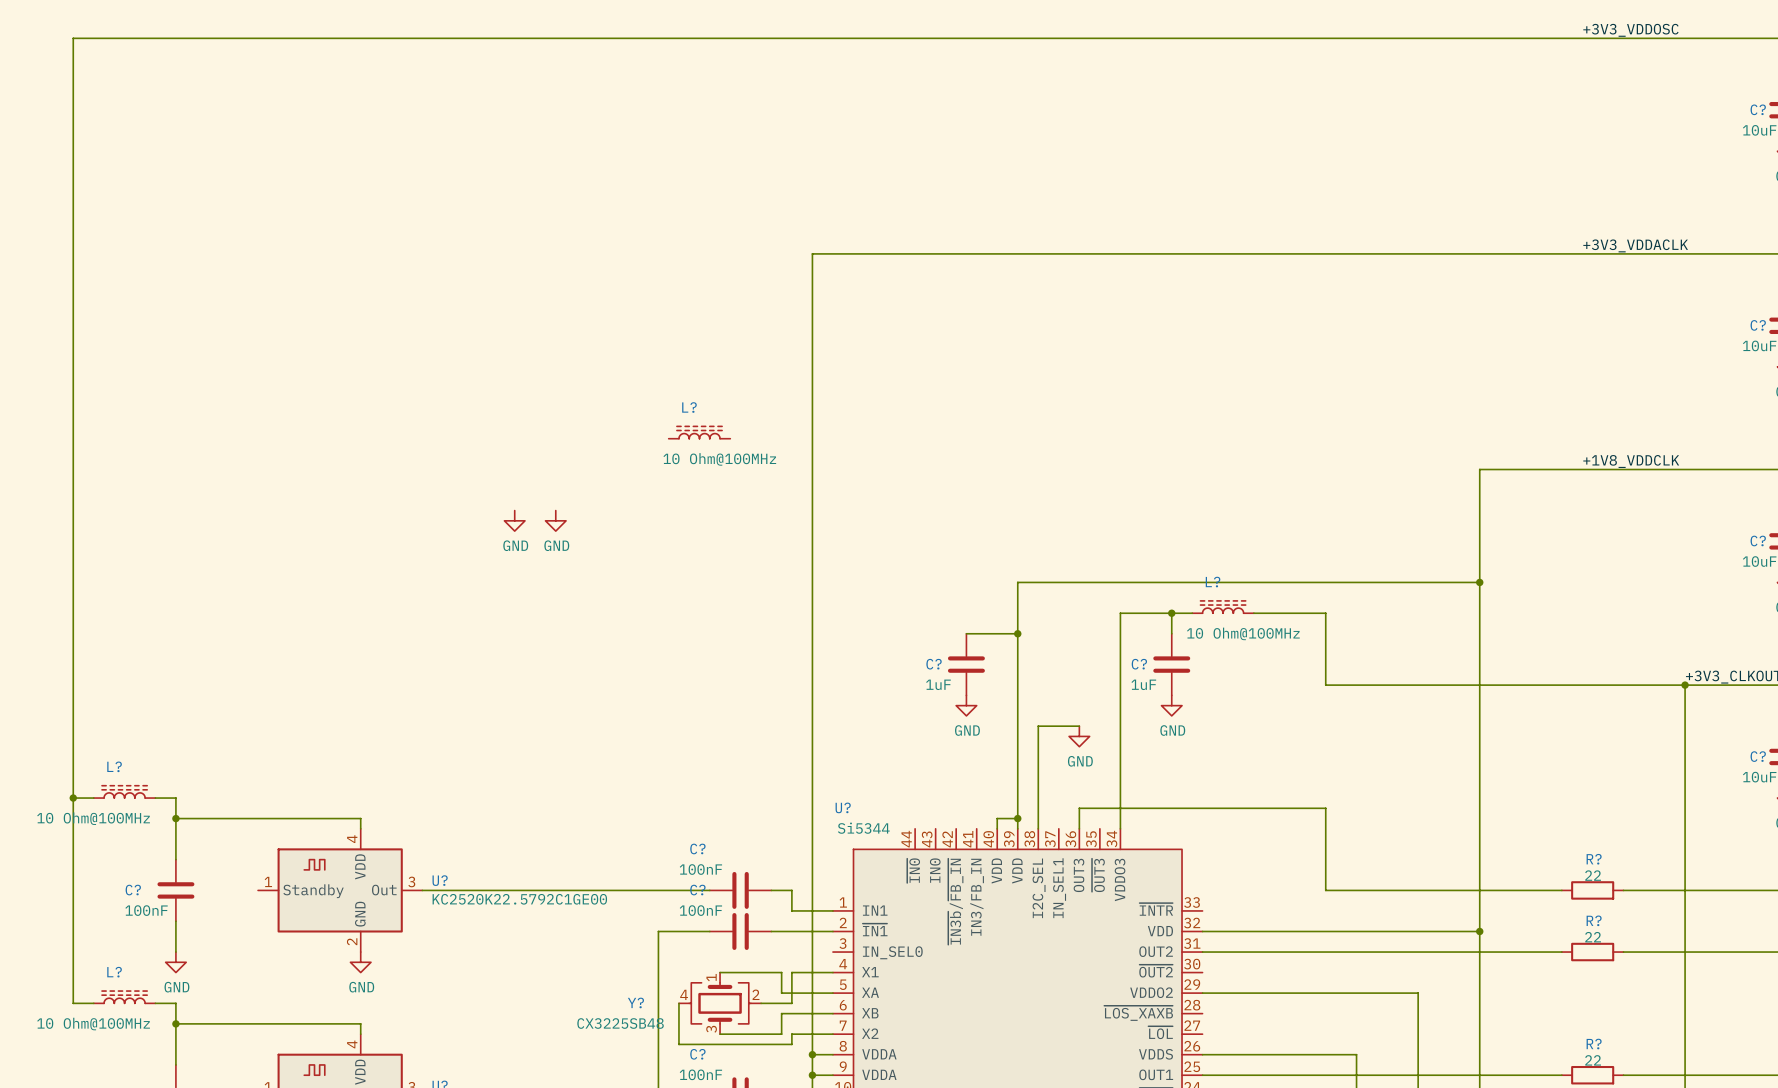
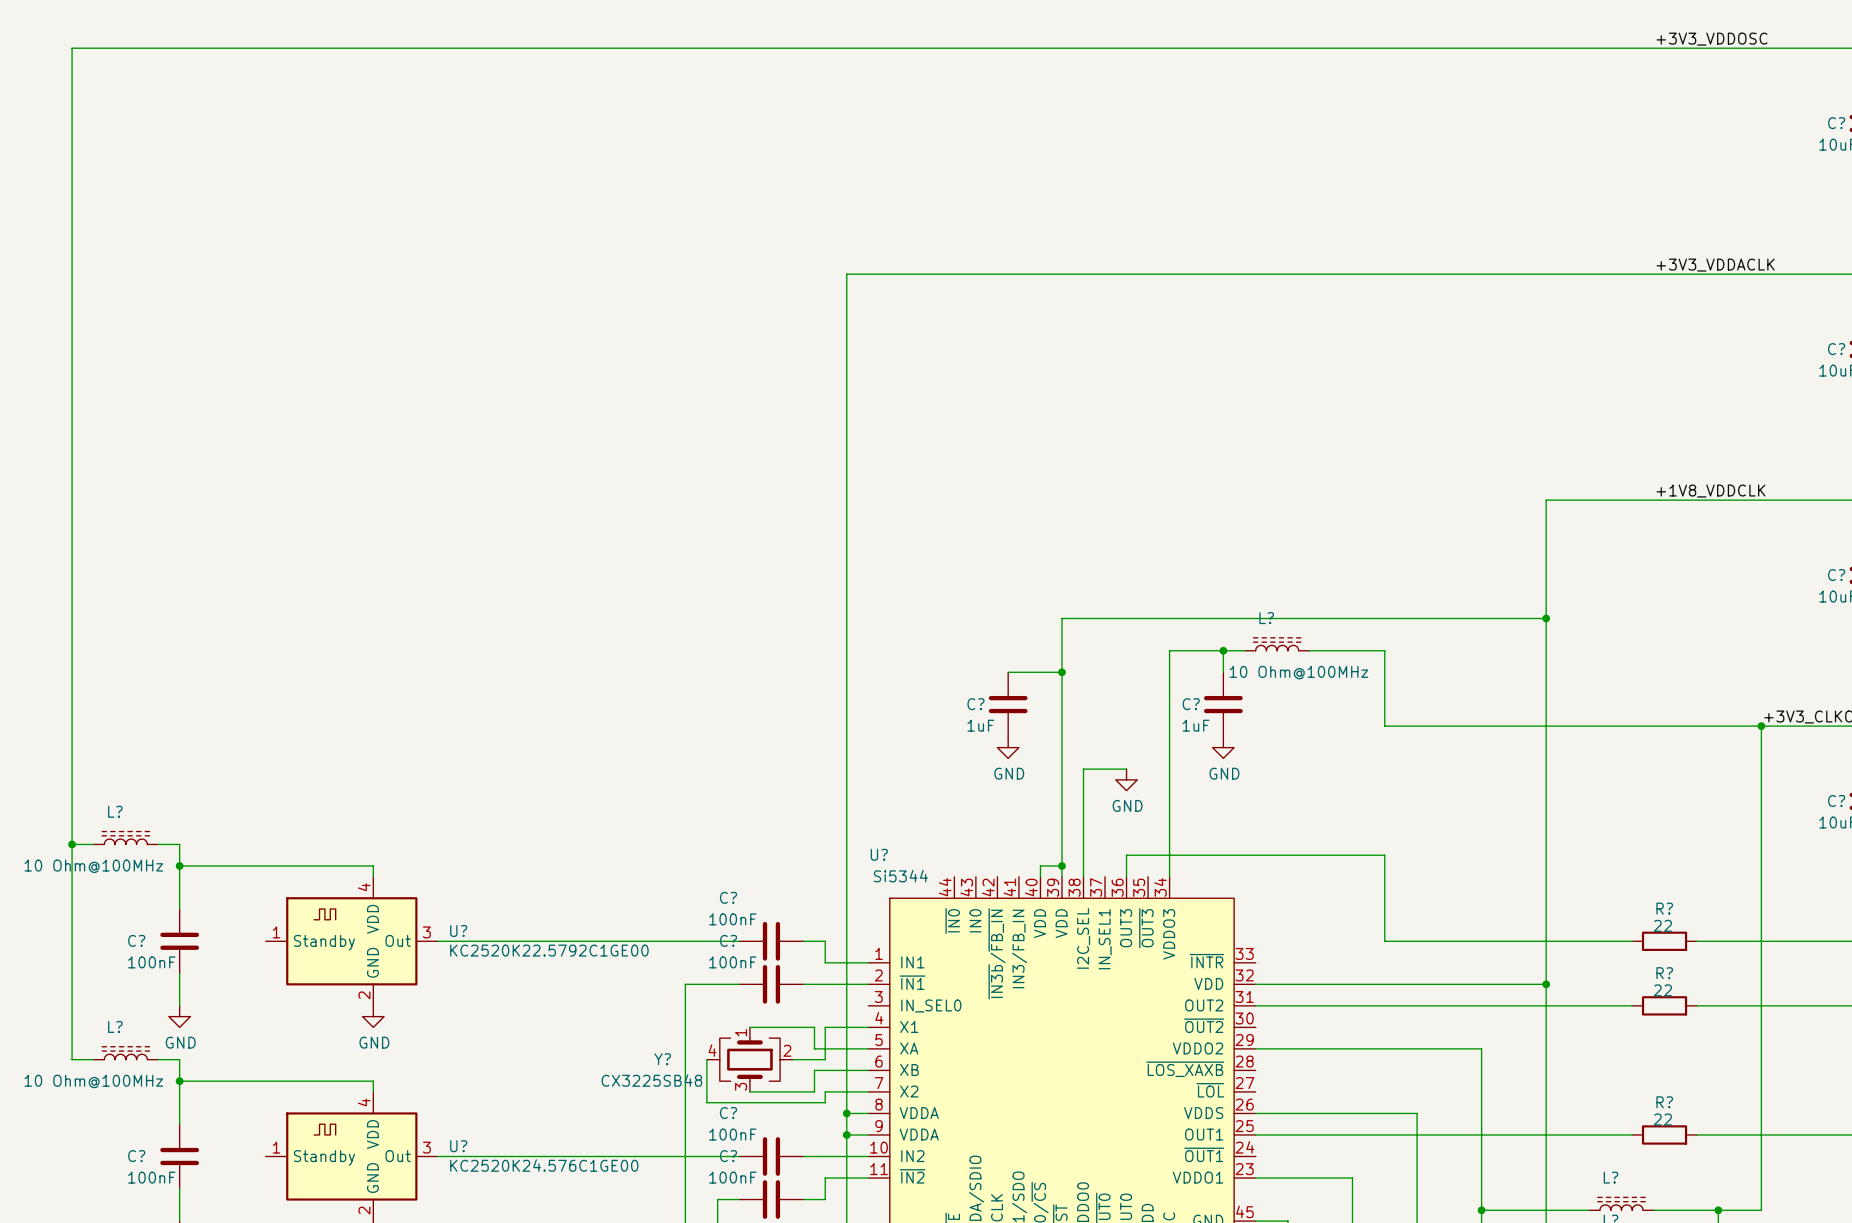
L?: 10 Ohm@100MHz (699, 432) -> none
power symbol: GND (514, 520) -> none
power symbol: GND (555, 520) -> none

